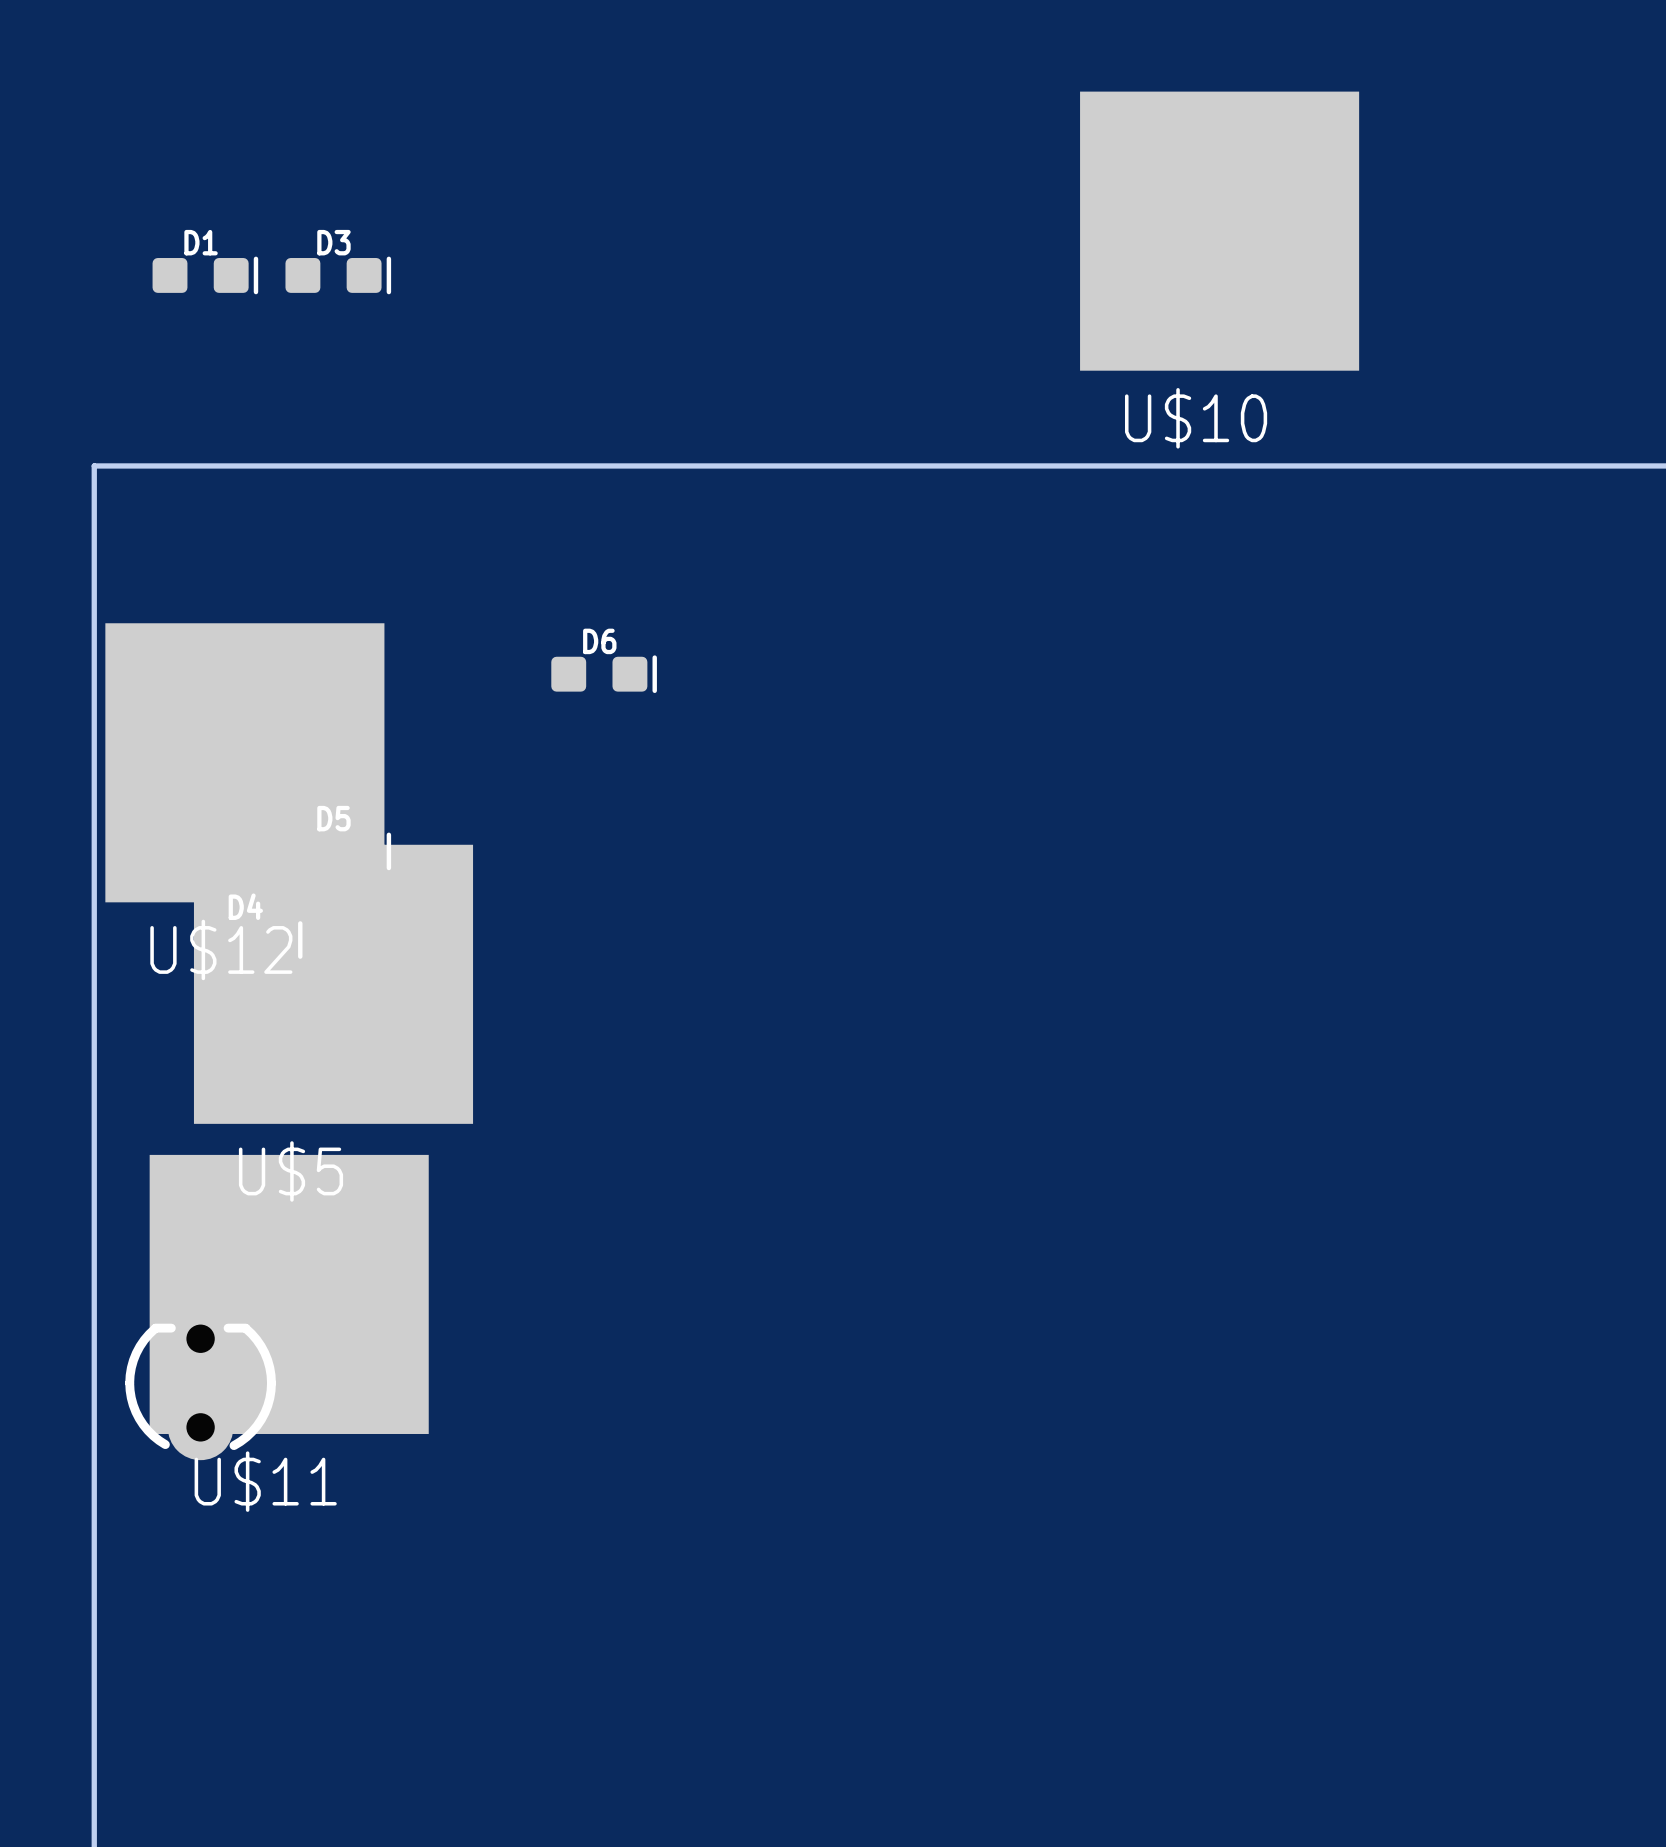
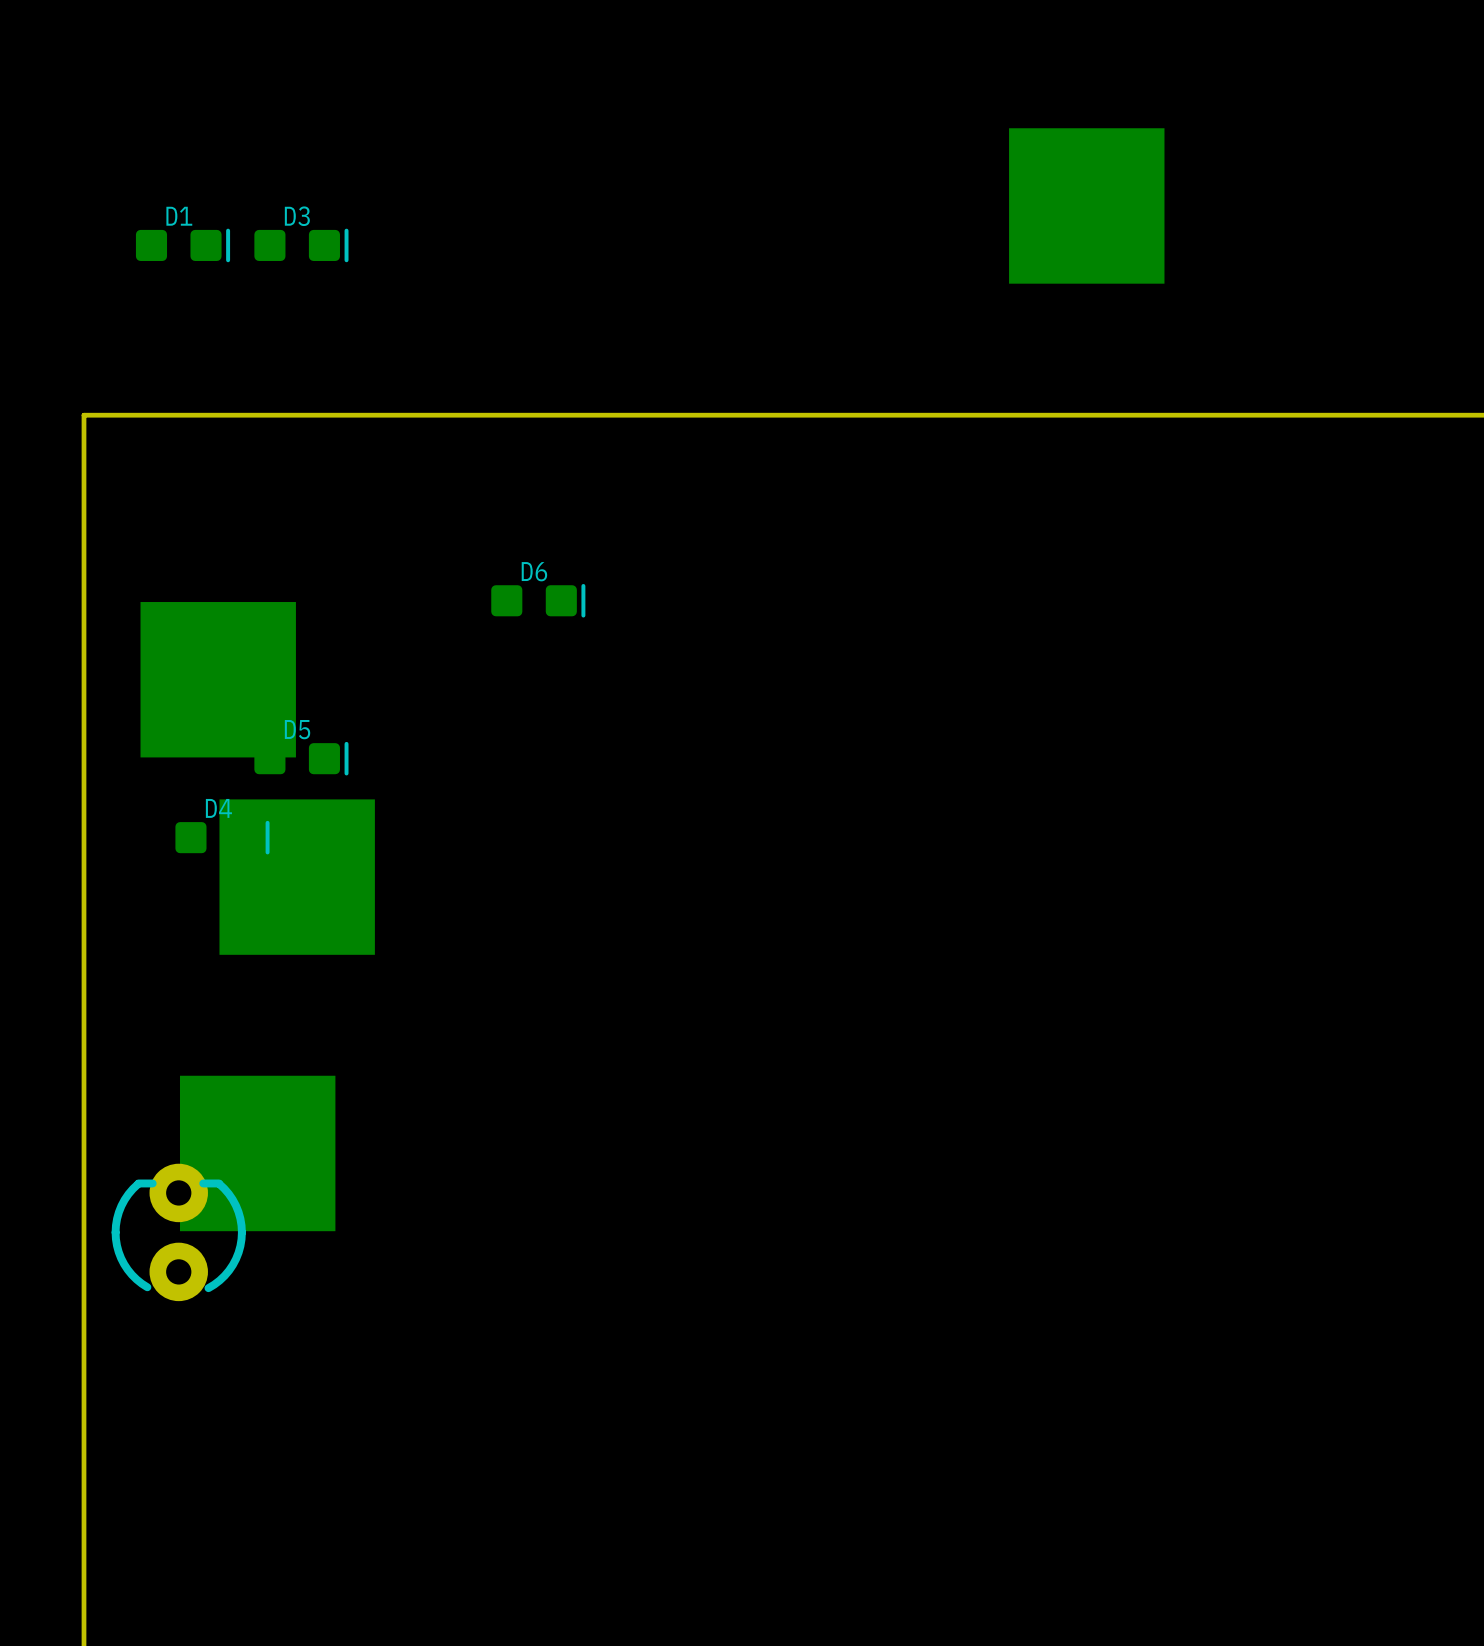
U$10: (1219, 231) -> none
part: none -> (1086, 205)
part: (244, 762) -> none
part: none -> (218, 679)
part: (333, 984) -> none
part: none -> (297, 877)
U$11: (289, 1294) -> none
part: none -> (257, 1153)

